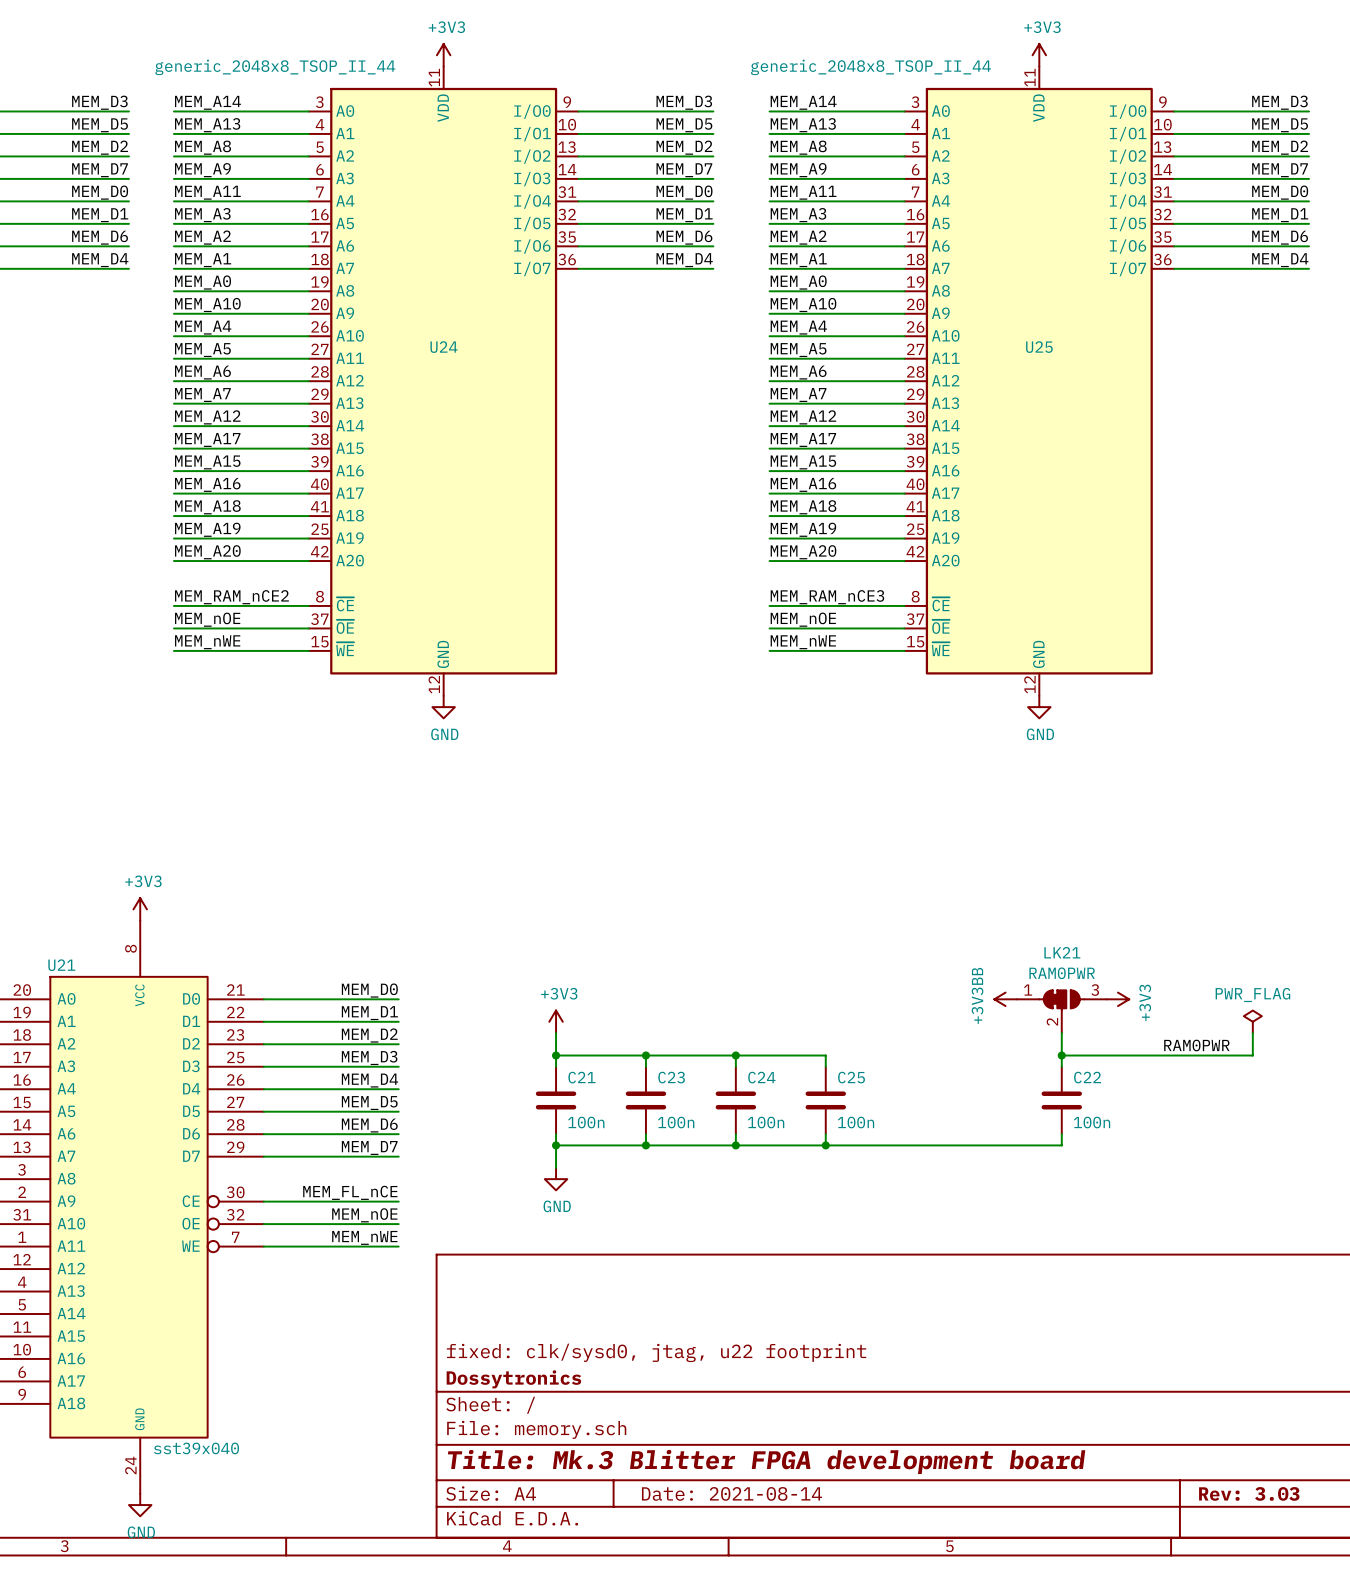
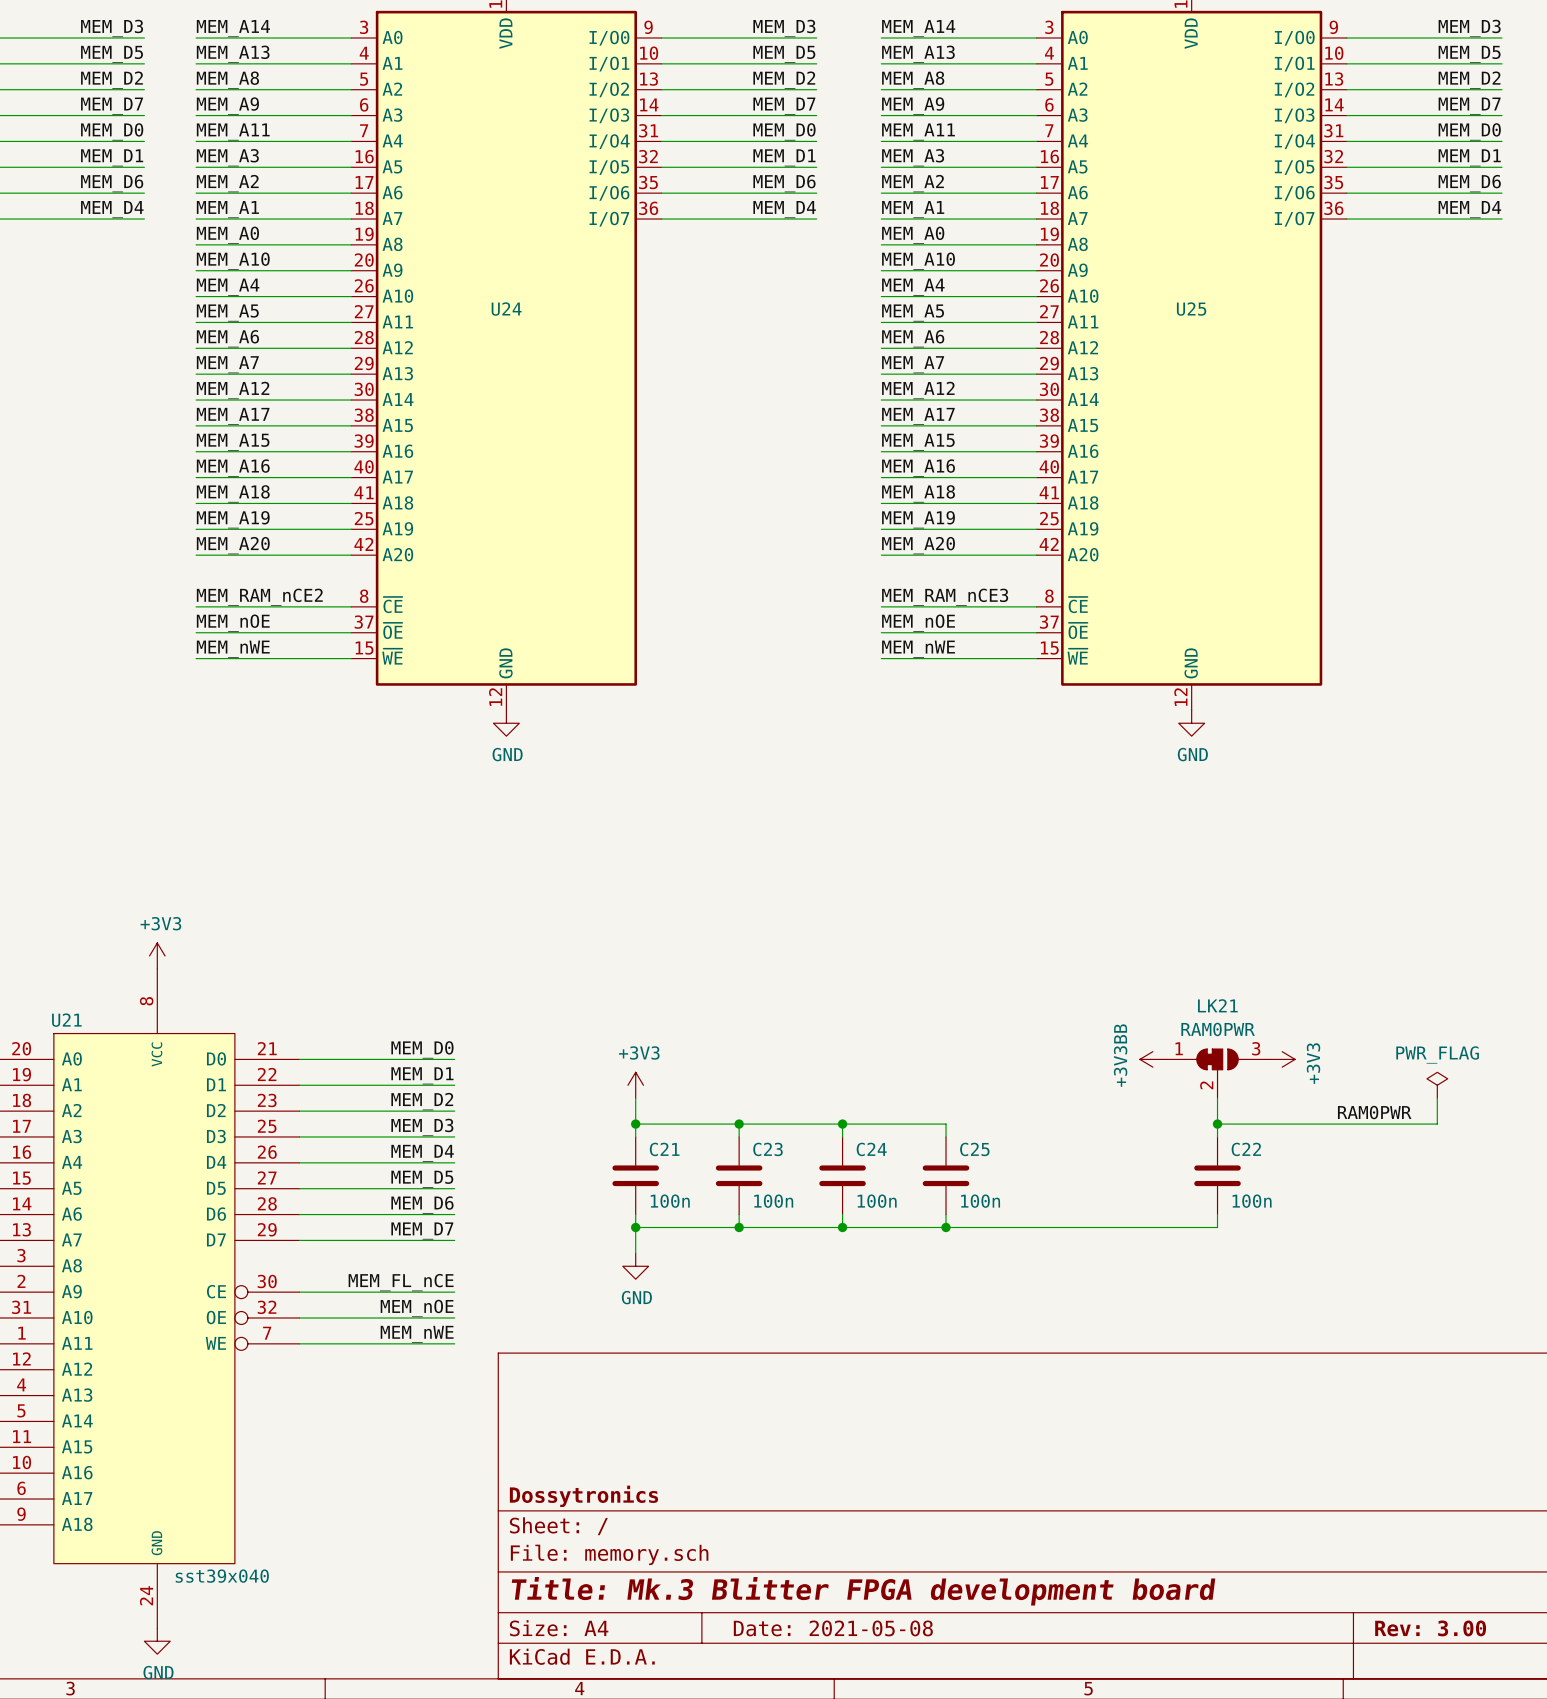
title block: fixed: clk/sysd0, jtag, u22 footprint (656, 1352) -> none
title block: Date: 2021-08-14 (731, 1493) -> Date: 2021-05-08 (833, 1628)
title block: Rev: 3.03 (1249, 1493) -> Rev: 3.00 (1430, 1628)

